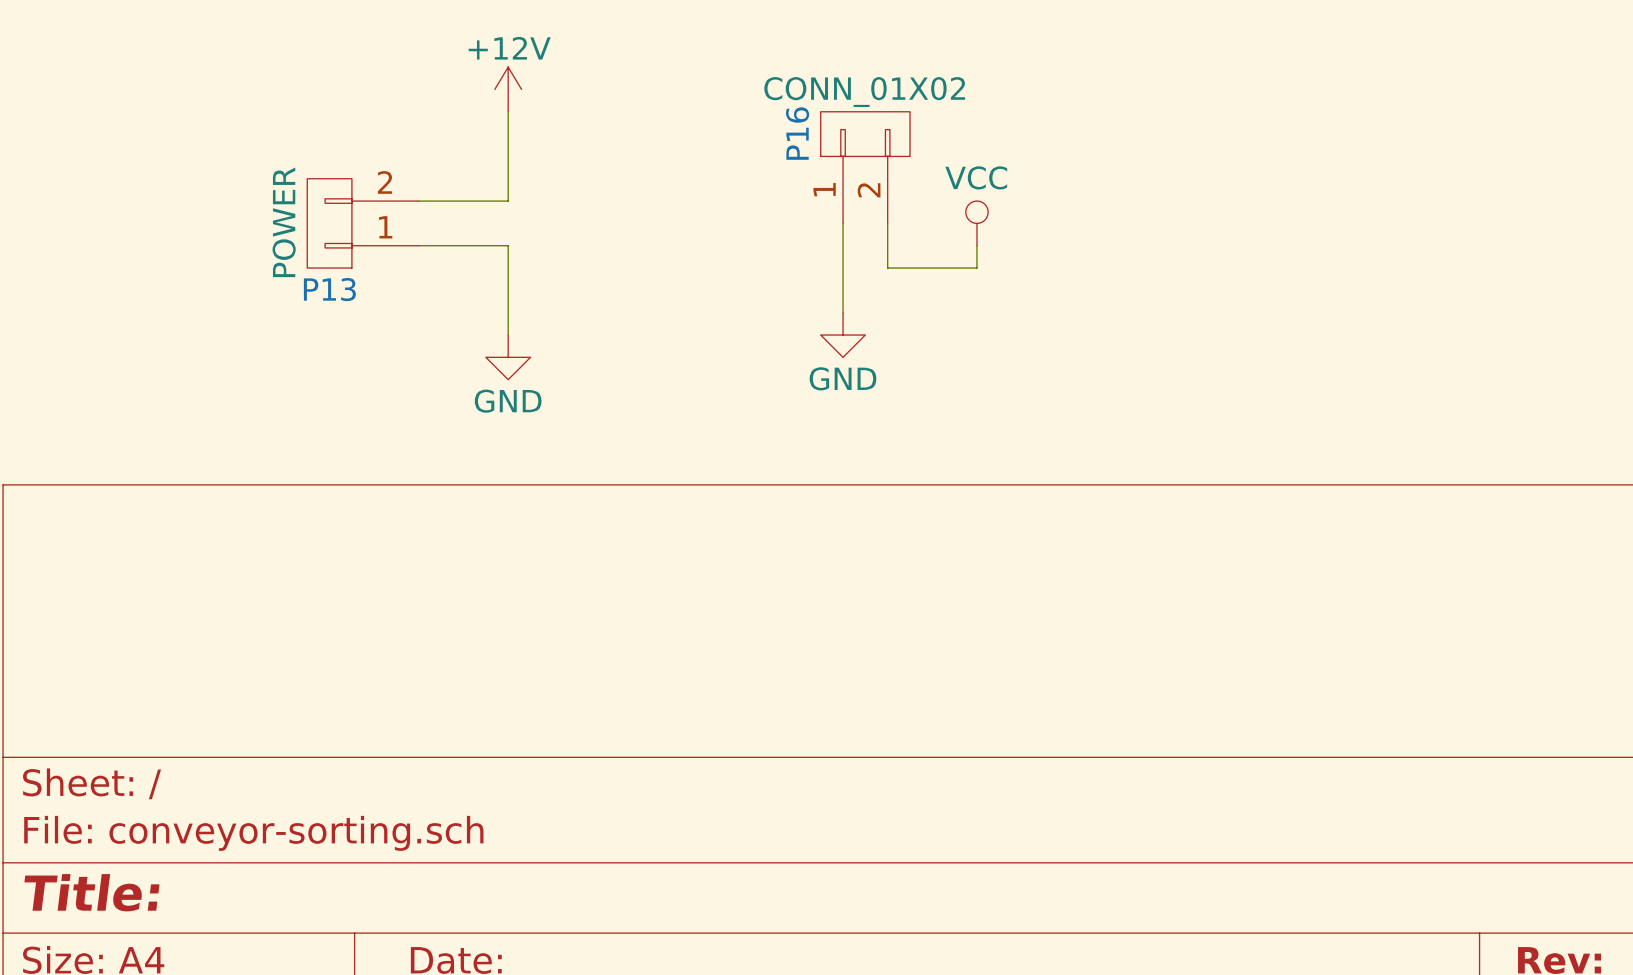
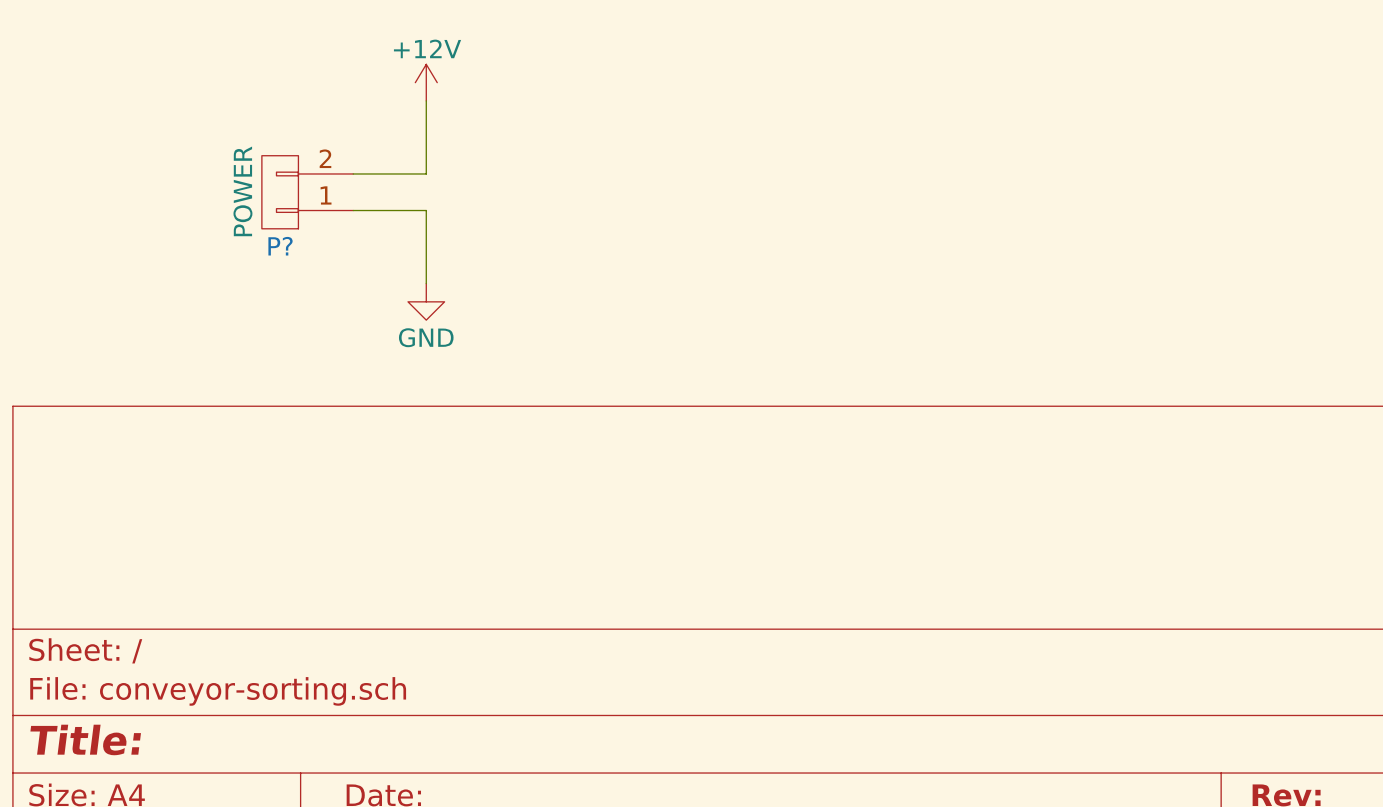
P16: CONN_01X02 (865, 167) -> none
wire: (843, 223) (843, 312) -> none
wire: (887, 223) (887, 268) (976, 268) (976, 245) -> none
power symbol: VCC (976, 223) -> none
P13 name: P13 (329, 289) -> P? (280, 246)
power symbol: GND (843, 335) -> none

